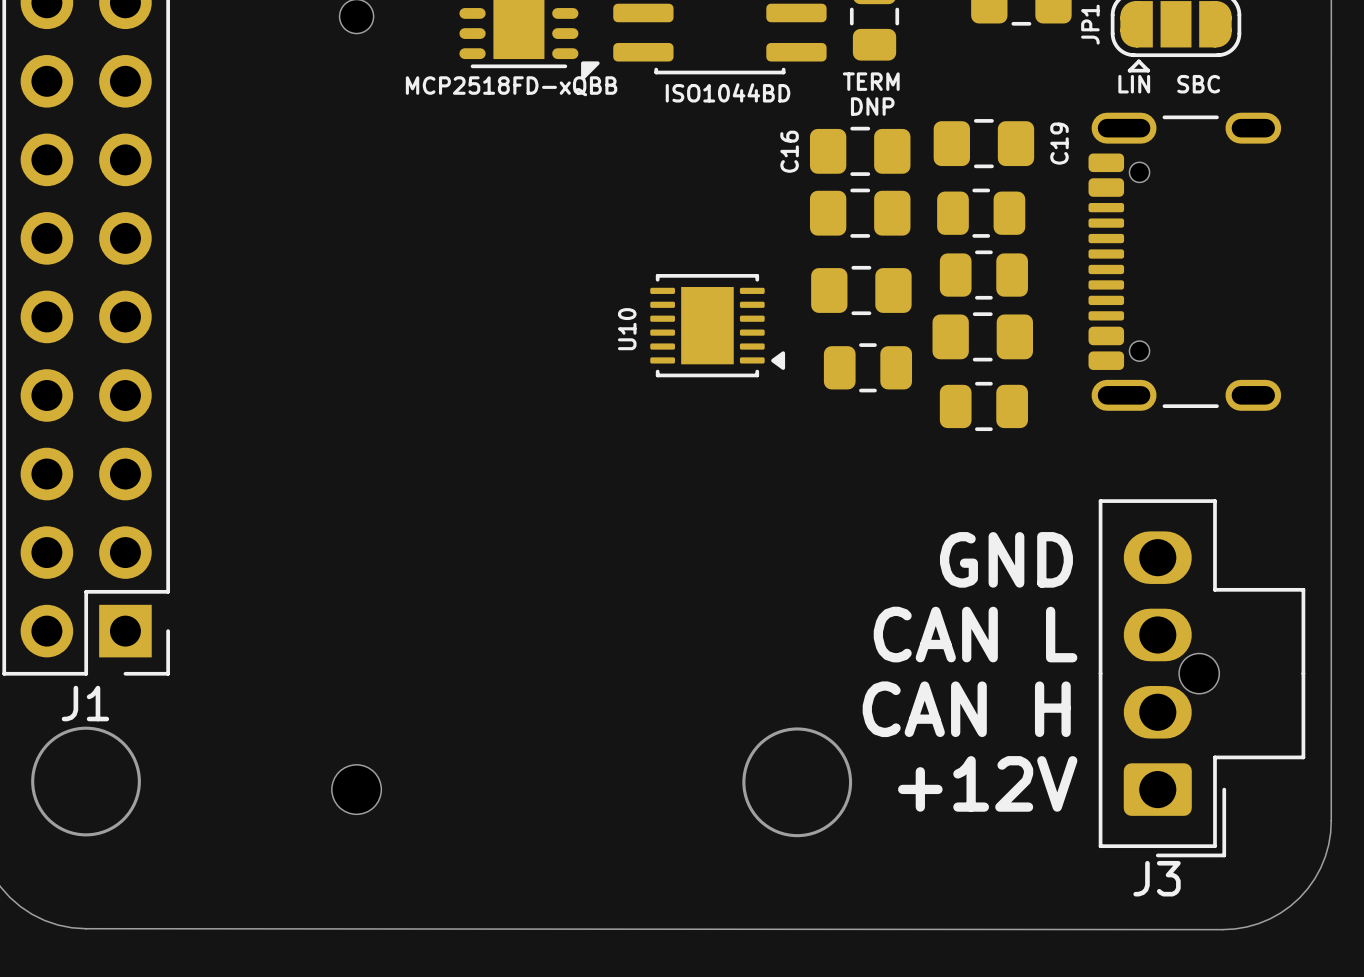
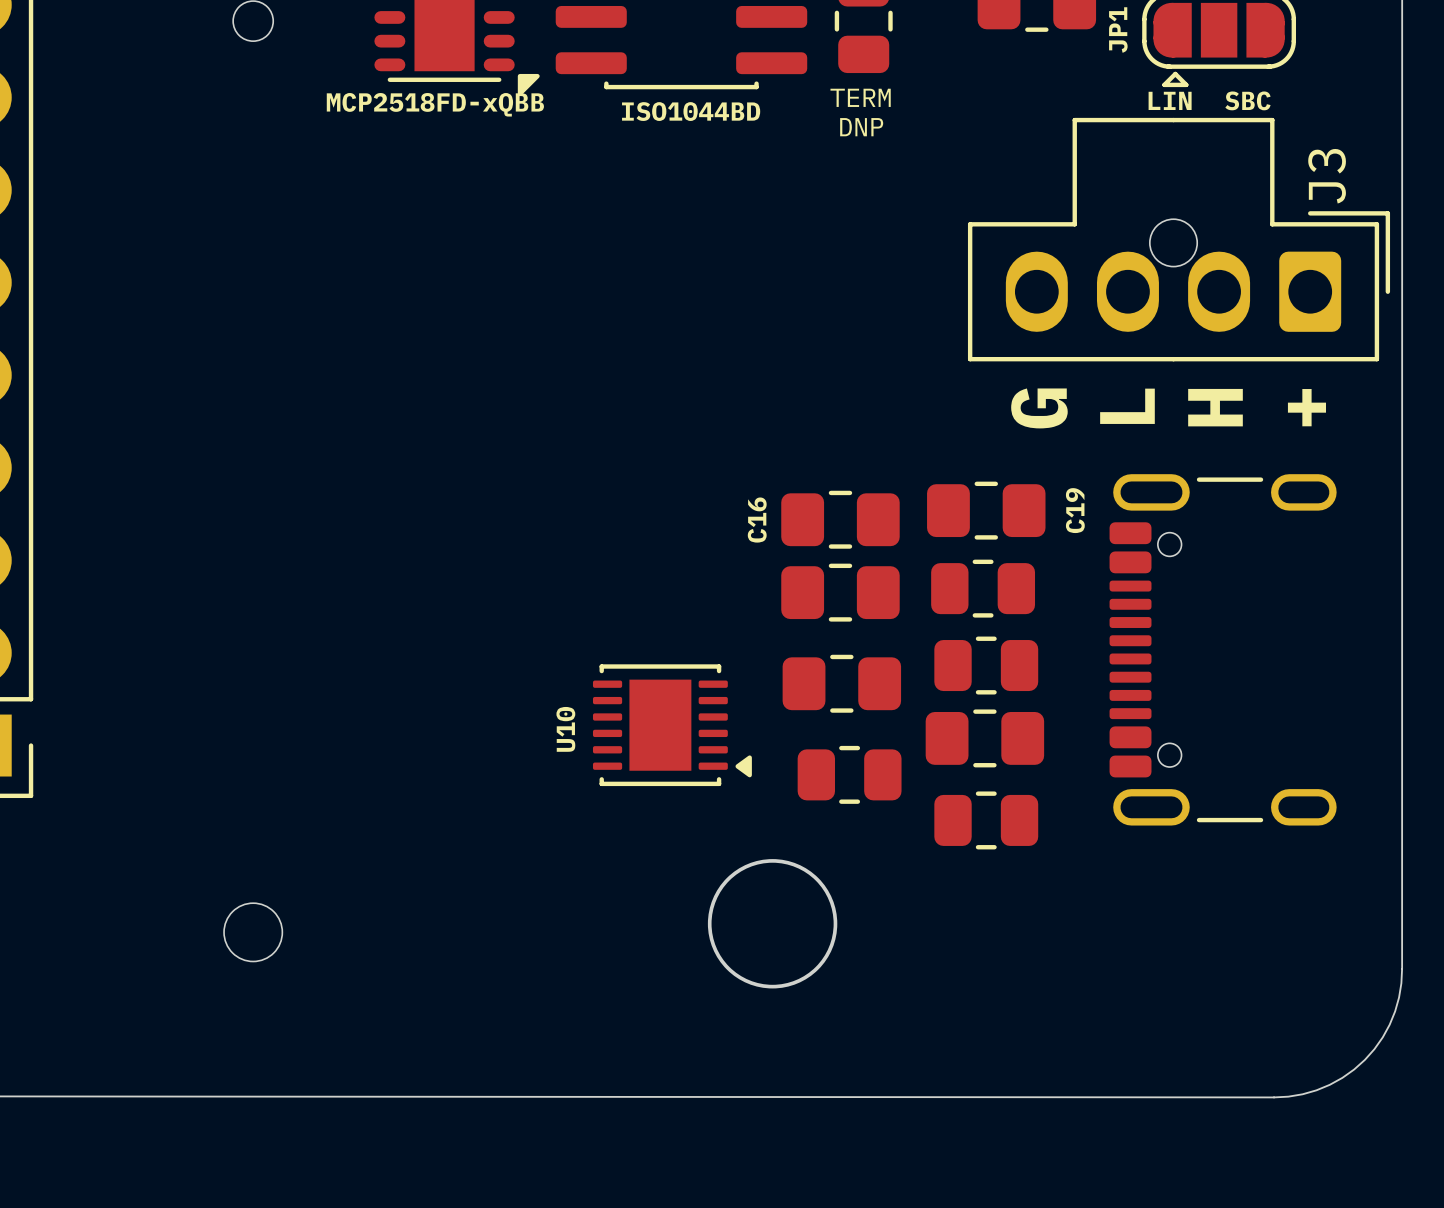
C19 position: (983, 143) -> (986, 510)
C16 position: (860, 151) -> (840, 519)
part: (860, 213) -> none
part: (981, 213) -> none
part position: (1184, 261) -> (1223, 649)
part: (983, 275) -> none
part: (861, 290) -> none
U10 position: (717, 325) -> (672, 725)
text: none -> + (1306, 407)
text: none -> H (1215, 407)
text: none -> G (1039, 408)
part: (982, 336) -> none
text: none -> L (1127, 406)
part: (867, 367) -> none
part: (983, 406) -> none
part: none -> (983, 588)
part: none -> (840, 592)
text: GND (1006, 559) -> none
part: none -> (986, 665)
part: none -> (841, 683)
part: none -> (984, 738)
text: CAN L (975, 634) -> none
part: none -> (849, 774)
J3 rotation: 0° (1201, 678) -> 90° counterclockwise (1178, 239)
J3 position: (1201, 678) -> (1178, 239)
part: none -> (986, 820)
text: CAN H (966, 709) -> none
text: +12V (987, 783) -> none
J3 name position: J3 (1157, 878) -> J3 (1327, 176)

